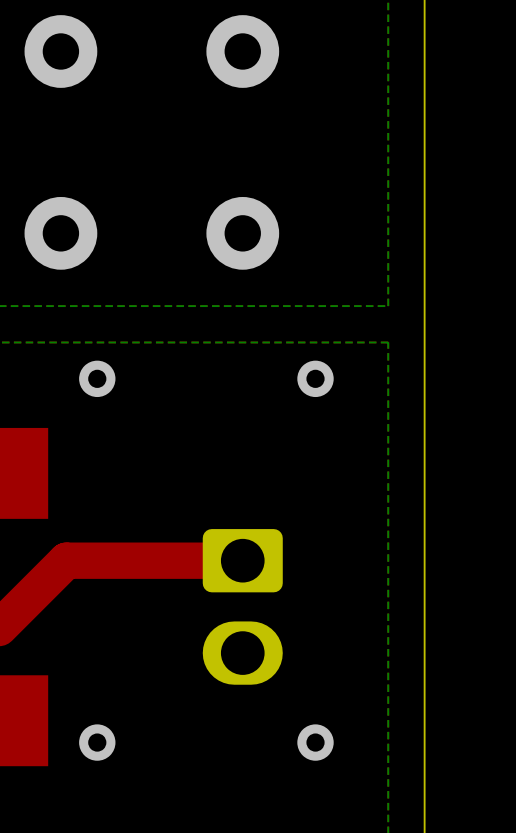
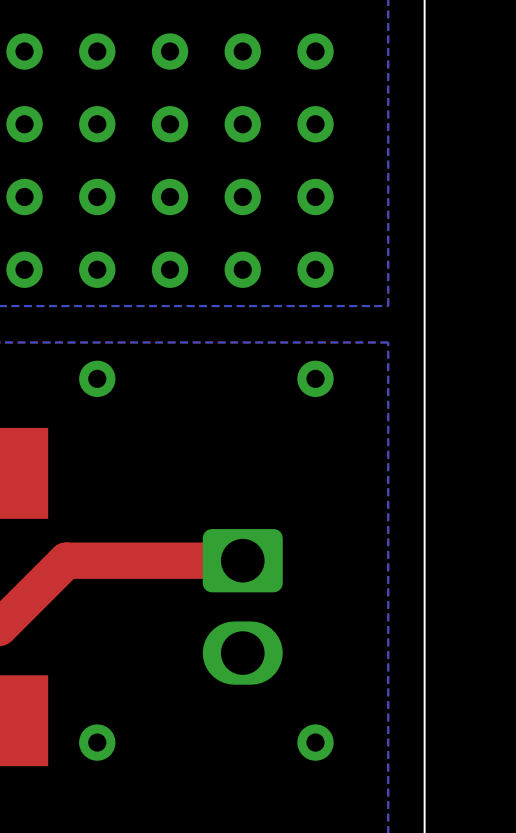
via size: [206, 15, 280, 88] -> [224, 33, 261, 70]
via: none -> (24, 51)
via: (60, 51) -> none
via: none -> (97, 51)
via: none -> (170, 51)
via: none -> (315, 51)
via: none -> (24, 124)
via: none -> (97, 124)
via: none -> (170, 124)
via: none -> (242, 124)
via: none -> (315, 124)
via: none -> (24, 196)
via: none -> (97, 196)
via: none -> (170, 196)
via: none -> (242, 196)
via: none -> (315, 196)
via: (60, 233) -> none
via: (242, 233) -> none
via: none -> (24, 269)
via: none -> (97, 269)
via: none -> (170, 269)
via: none -> (242, 269)
via: none -> (315, 269)

